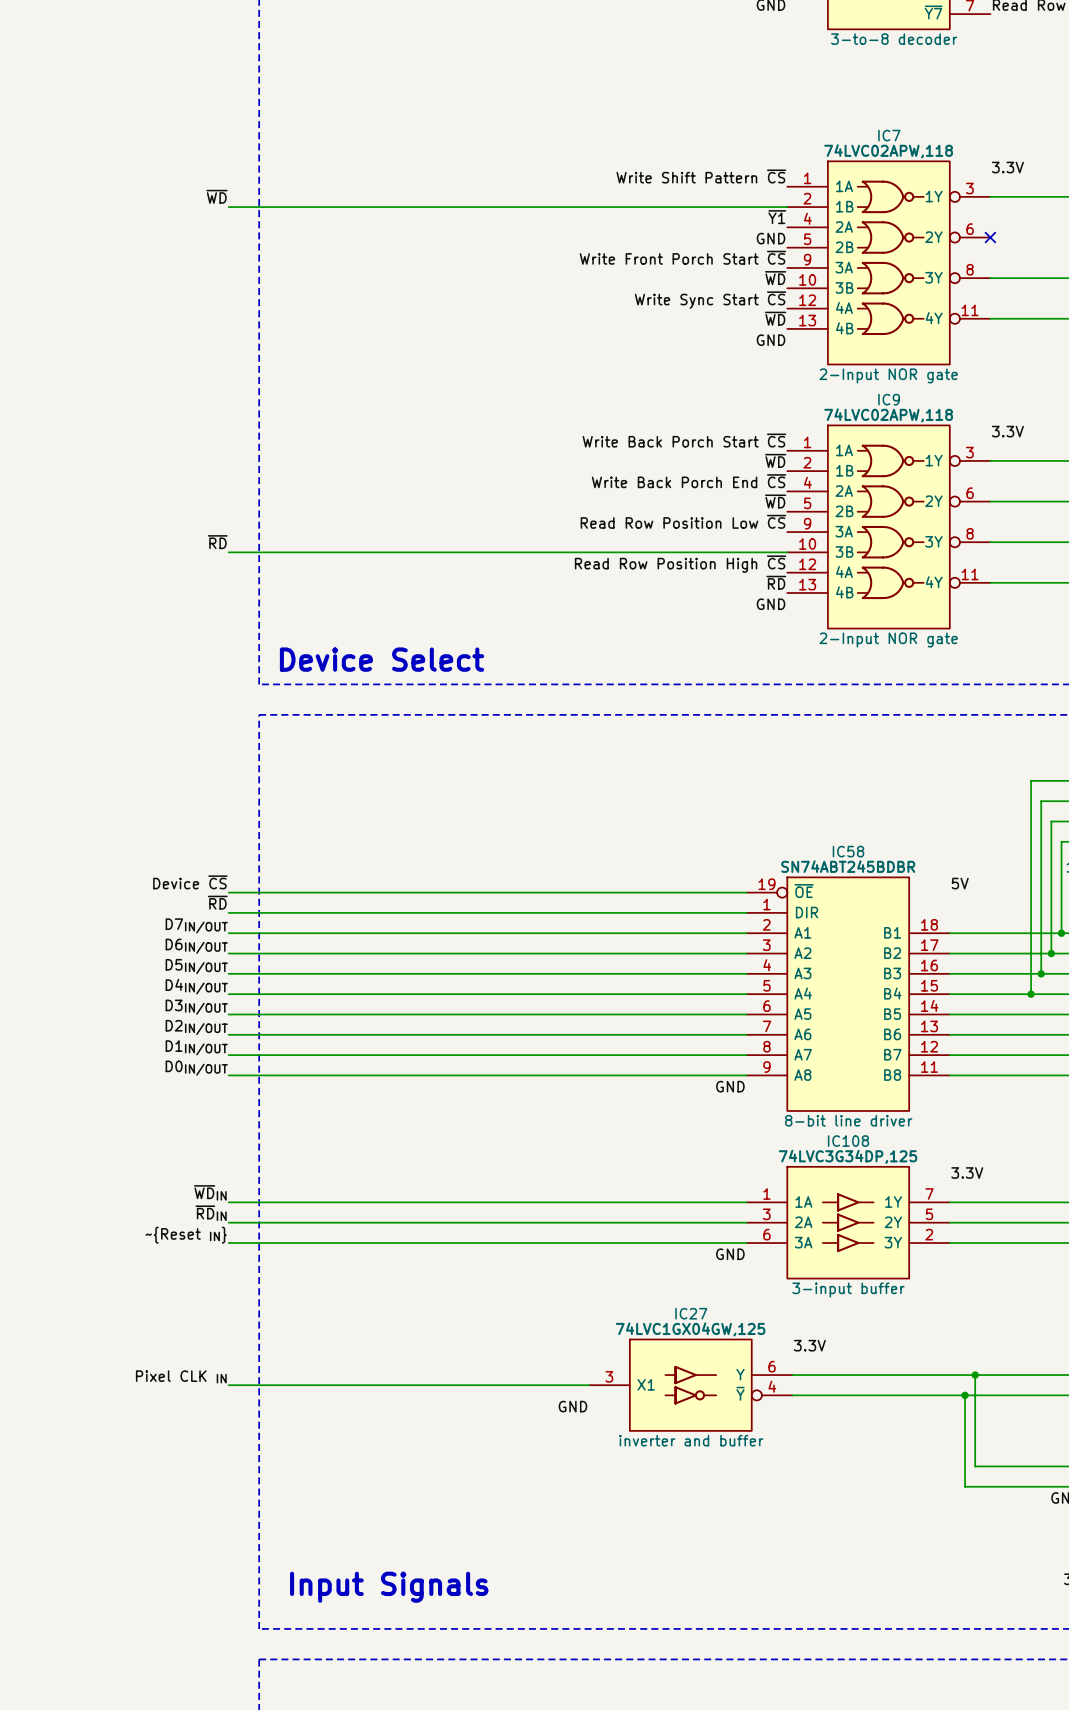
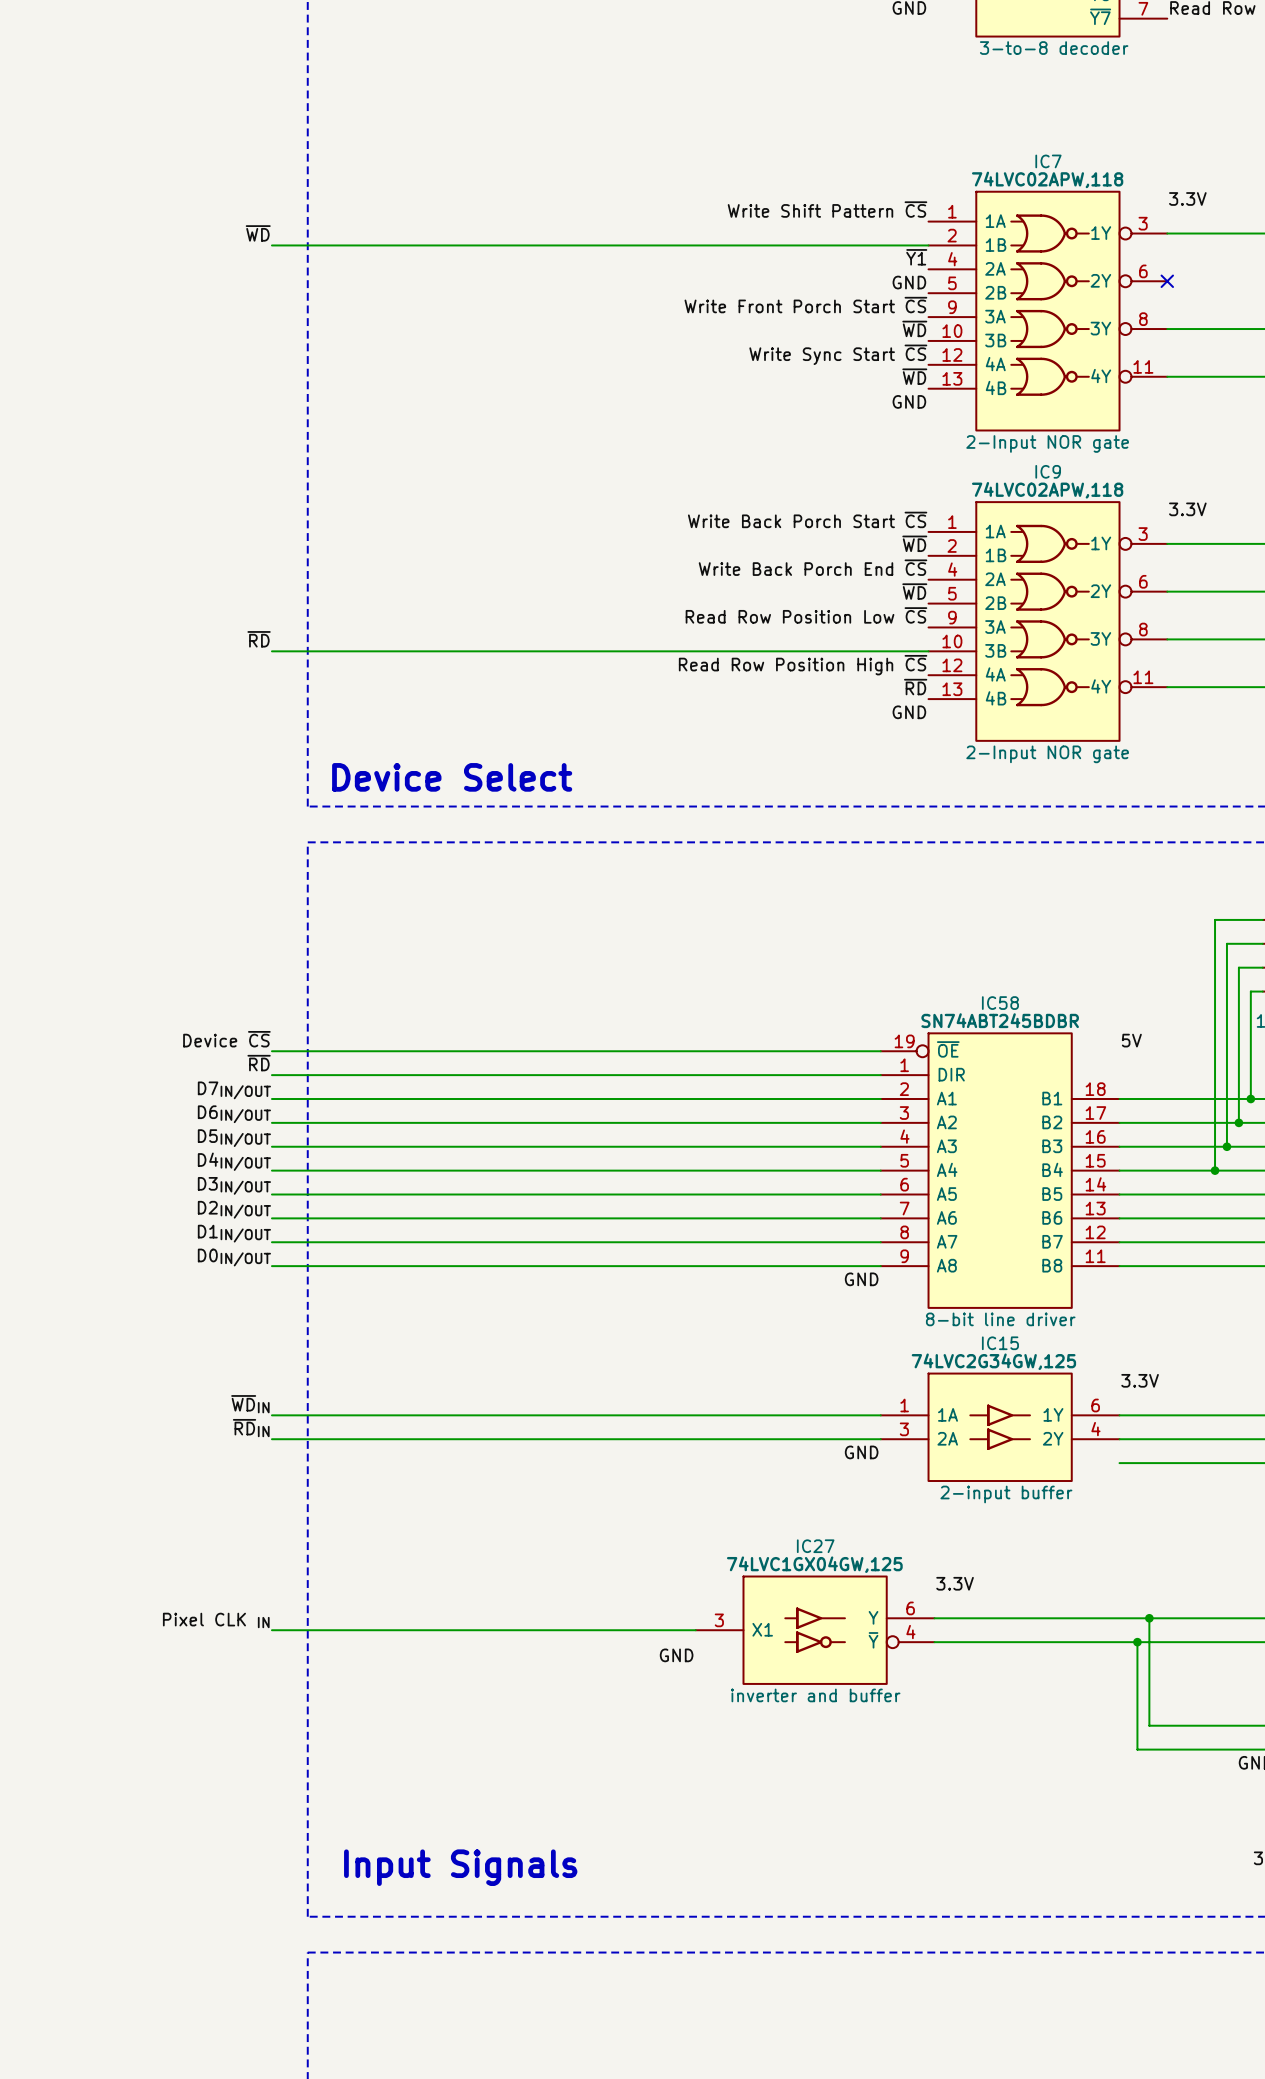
IC15: none -> 74LVC2G34GW,125 (1000, 1427)
IC108: 74LVC3G34DP,125 (848, 1222) -> none
label: ~{Reset IN} (186, 1235) -> none
wire: (228, 1243) (746, 1243) -> none
label position: GND (730, 1254) -> GND (861, 1452)

